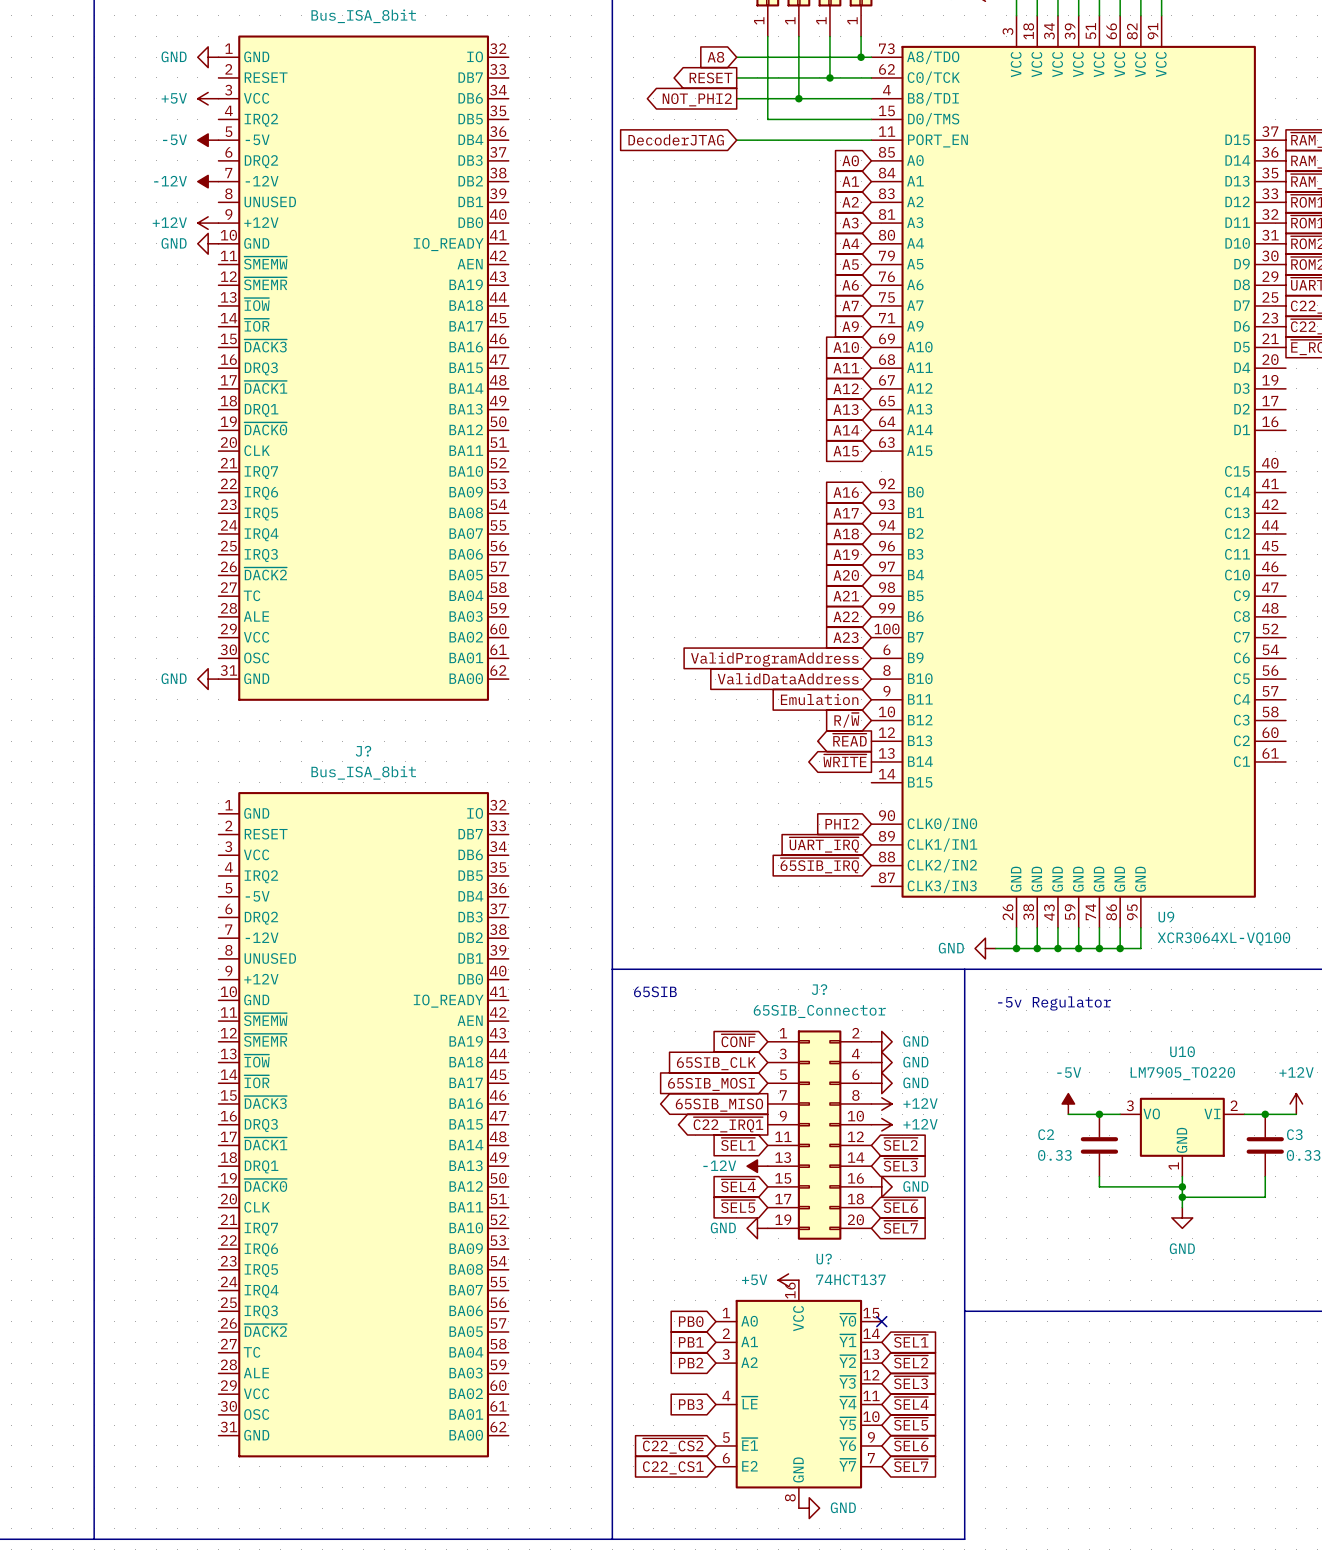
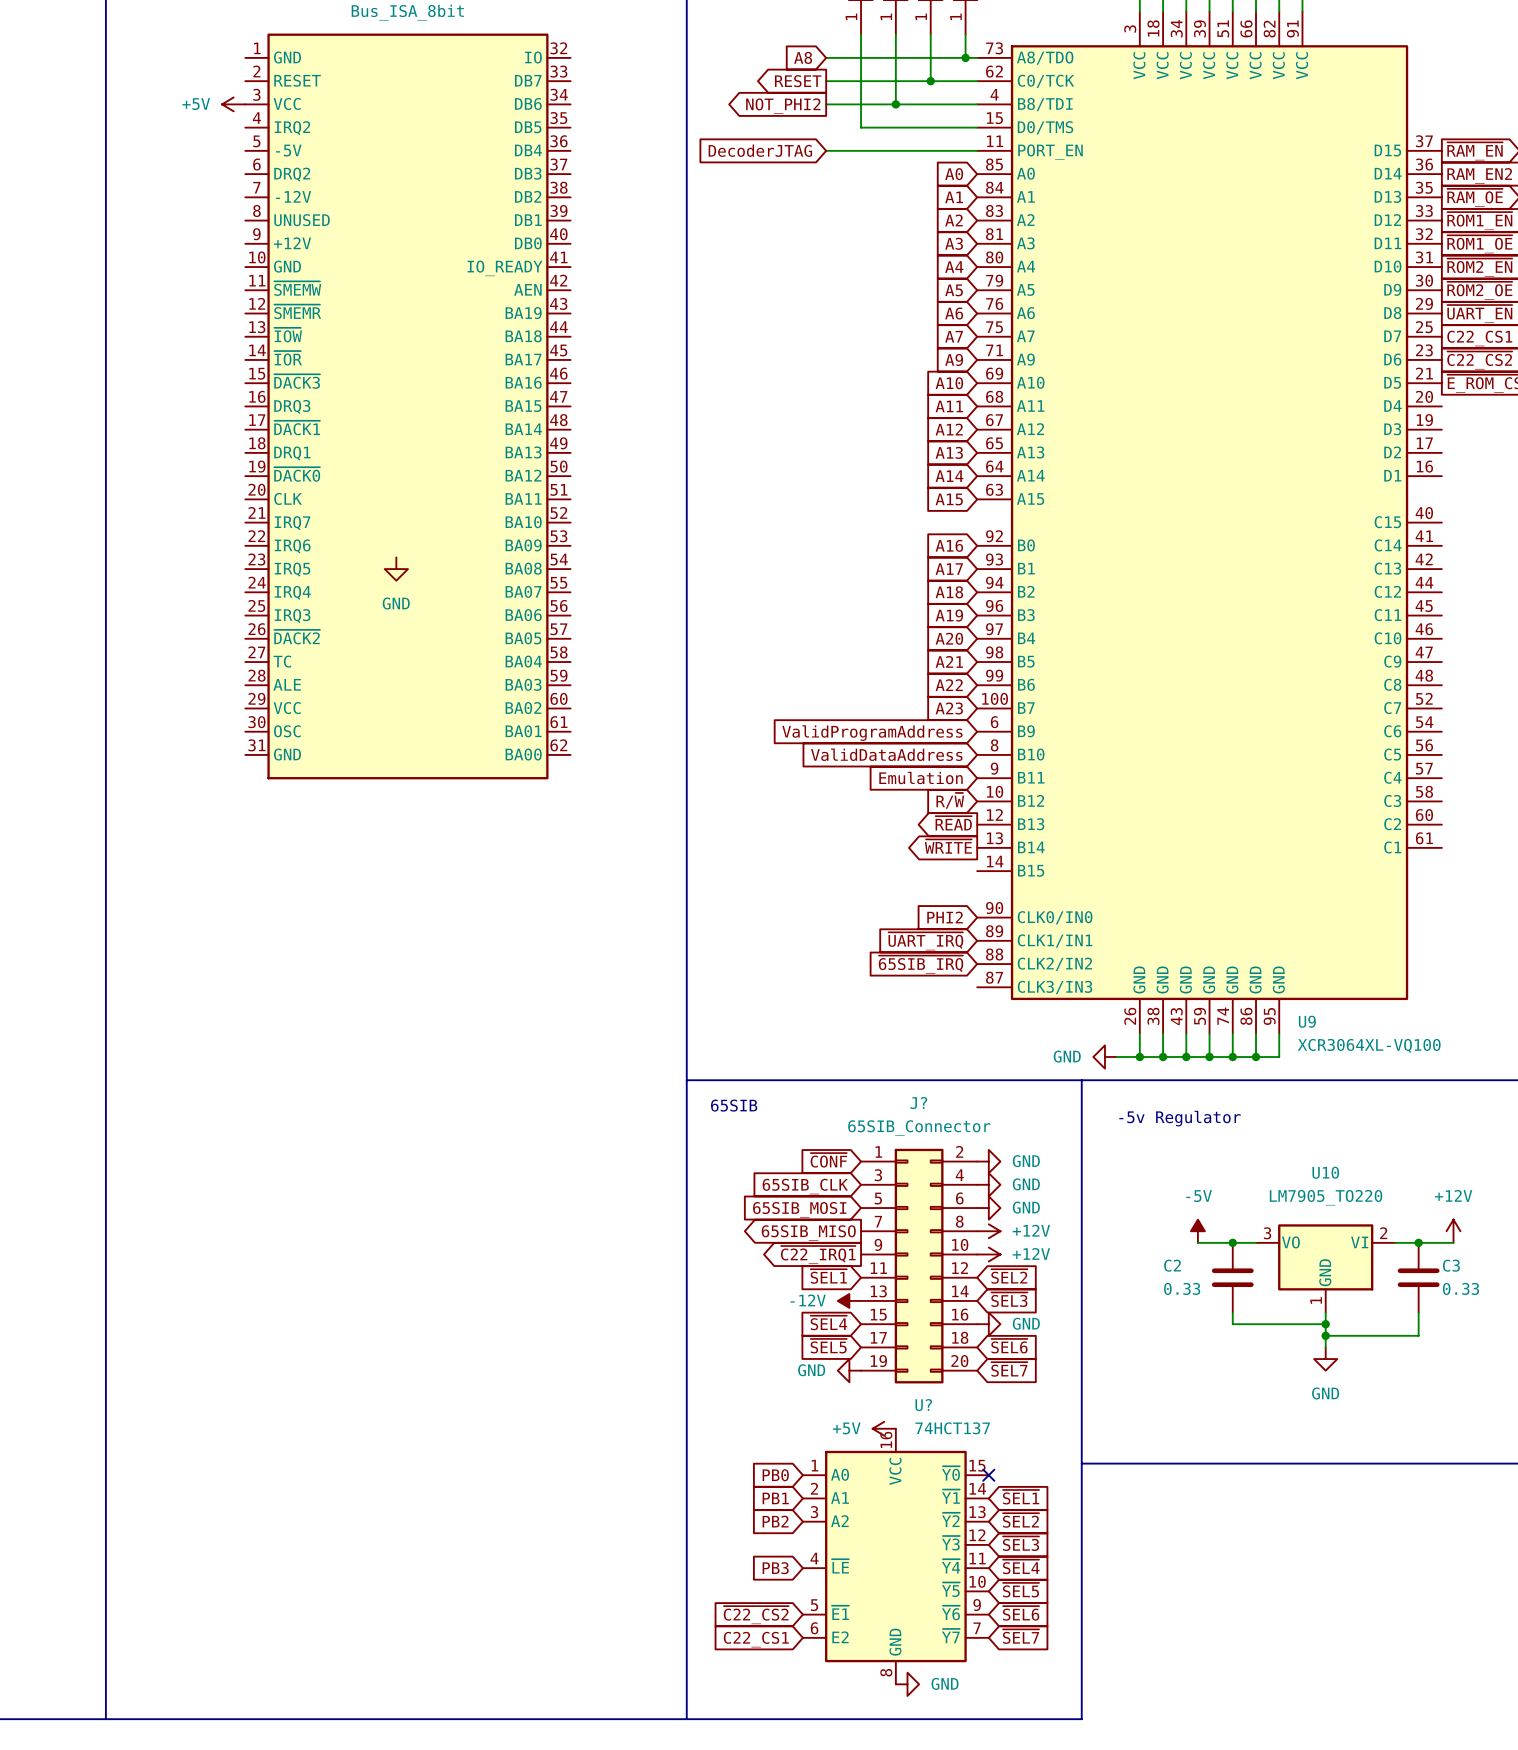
power symbol: GND (208, 57) -> none
power symbol: -5V (208, 140) -> none
power symbol: -12V (208, 181) -> none
power symbol: +12V (208, 223) -> none
power symbol: GND (208, 243) -> none
power symbol: none -> GND (396, 569)
power symbol: GND (208, 679) -> none
J?: Bus_ISA_8bit (363, 1124) -> none

